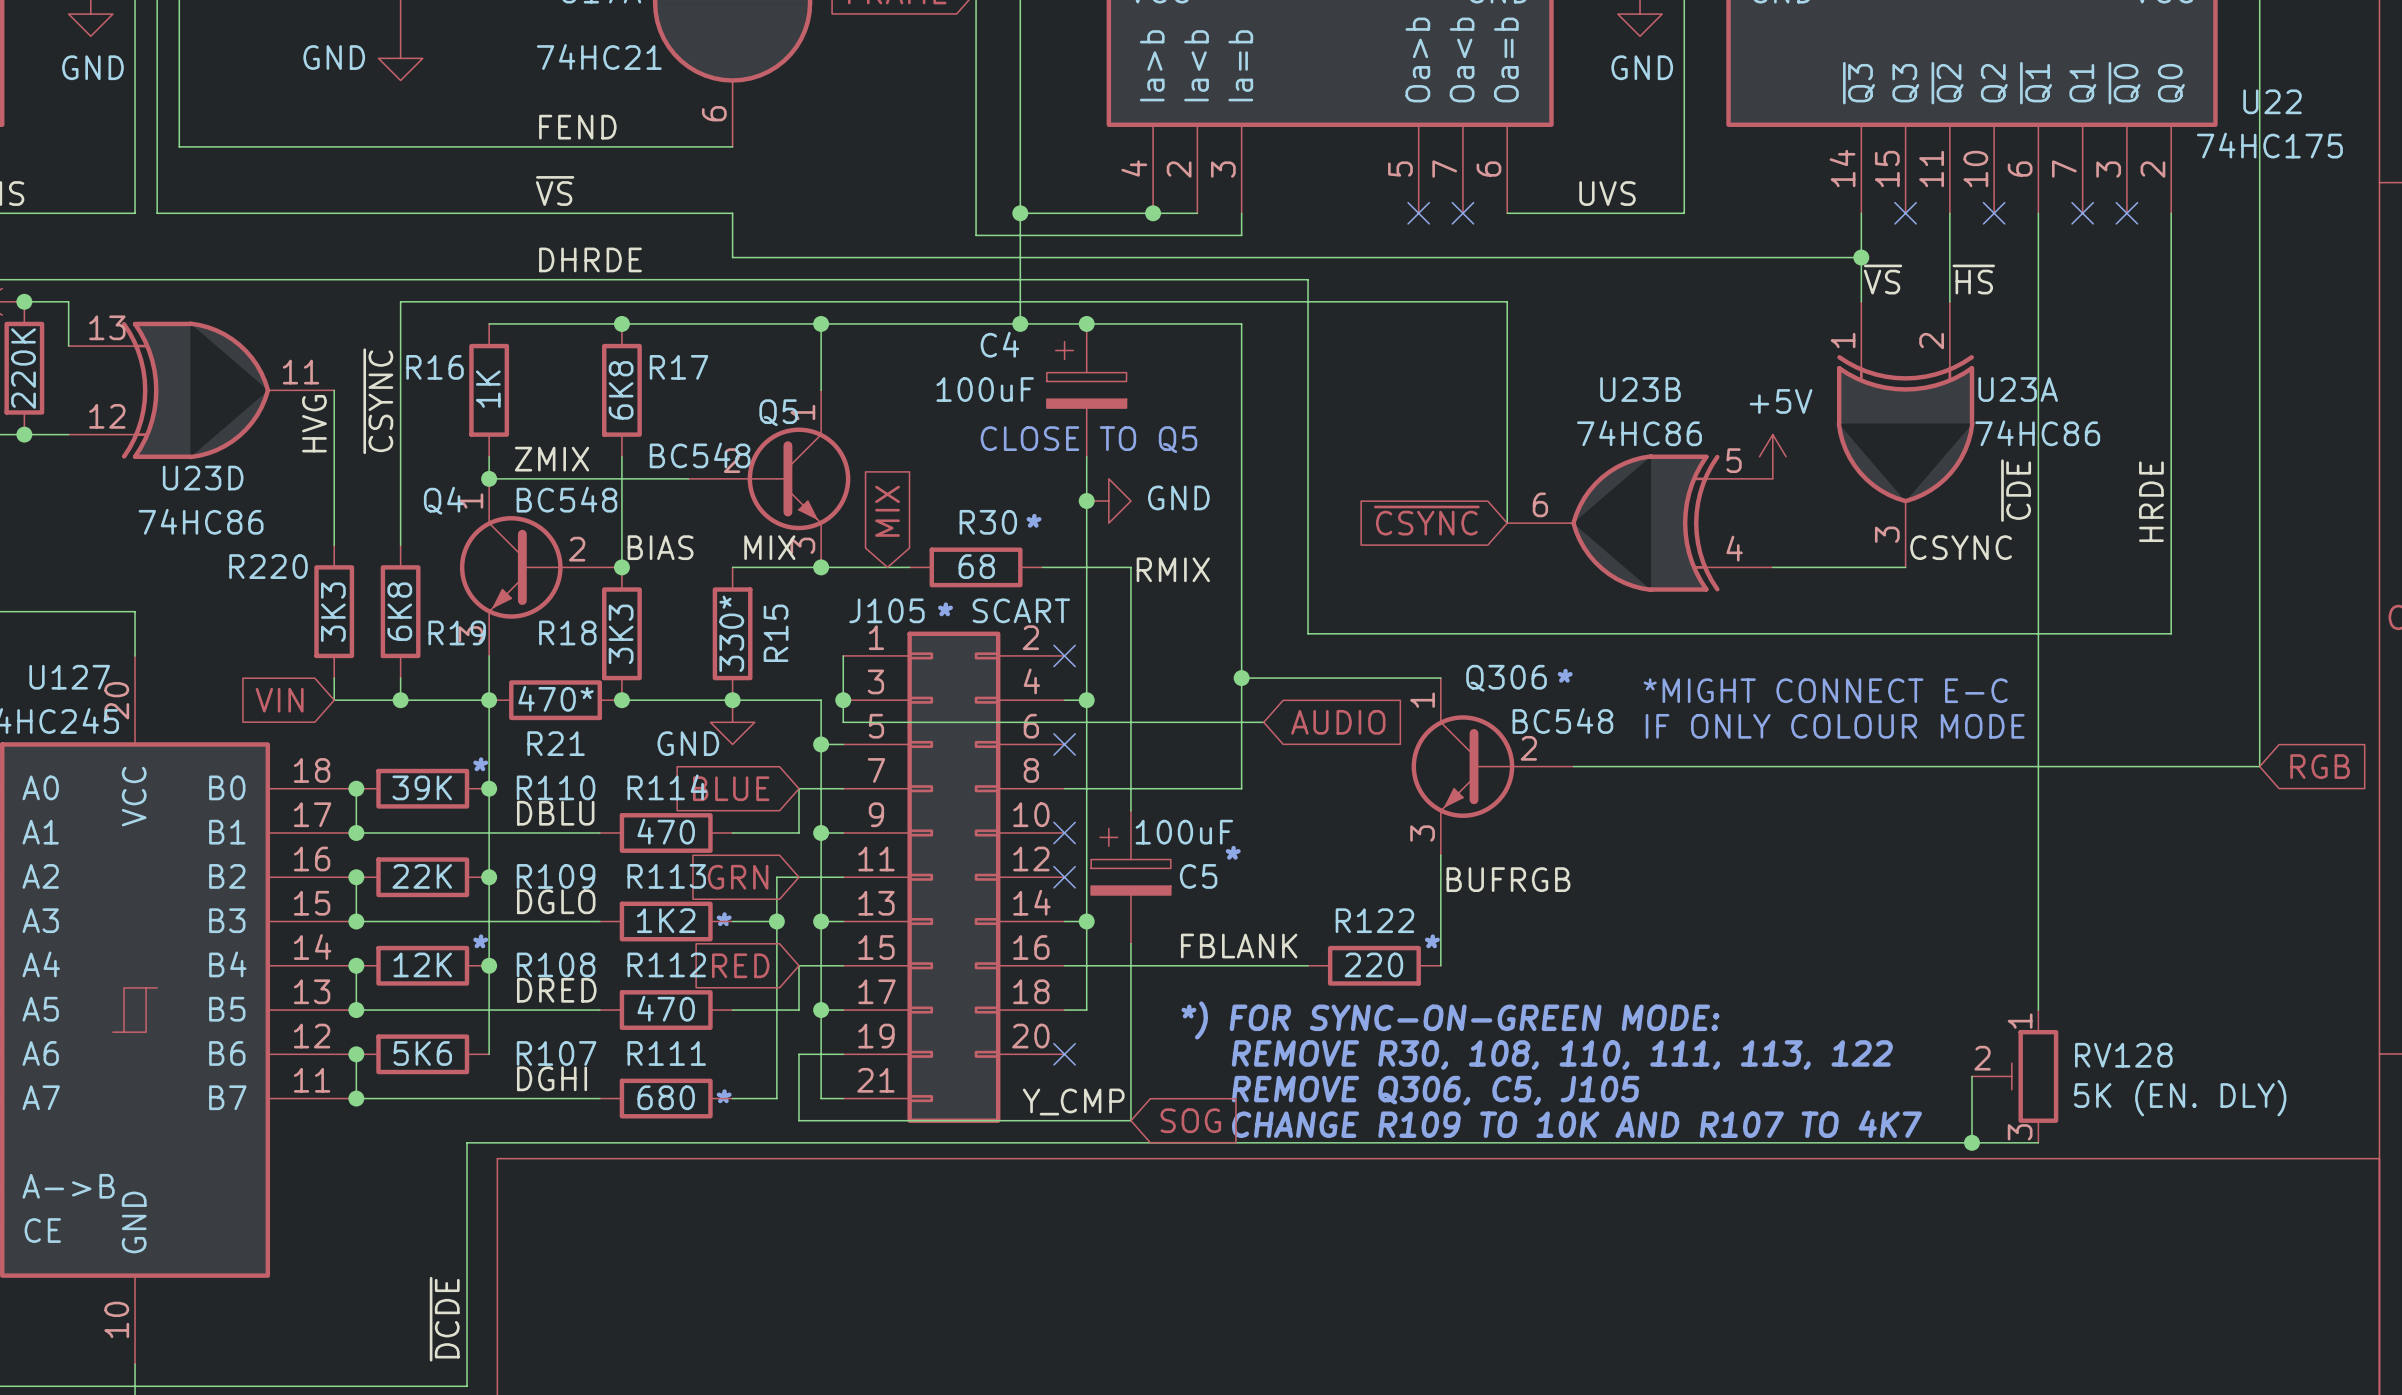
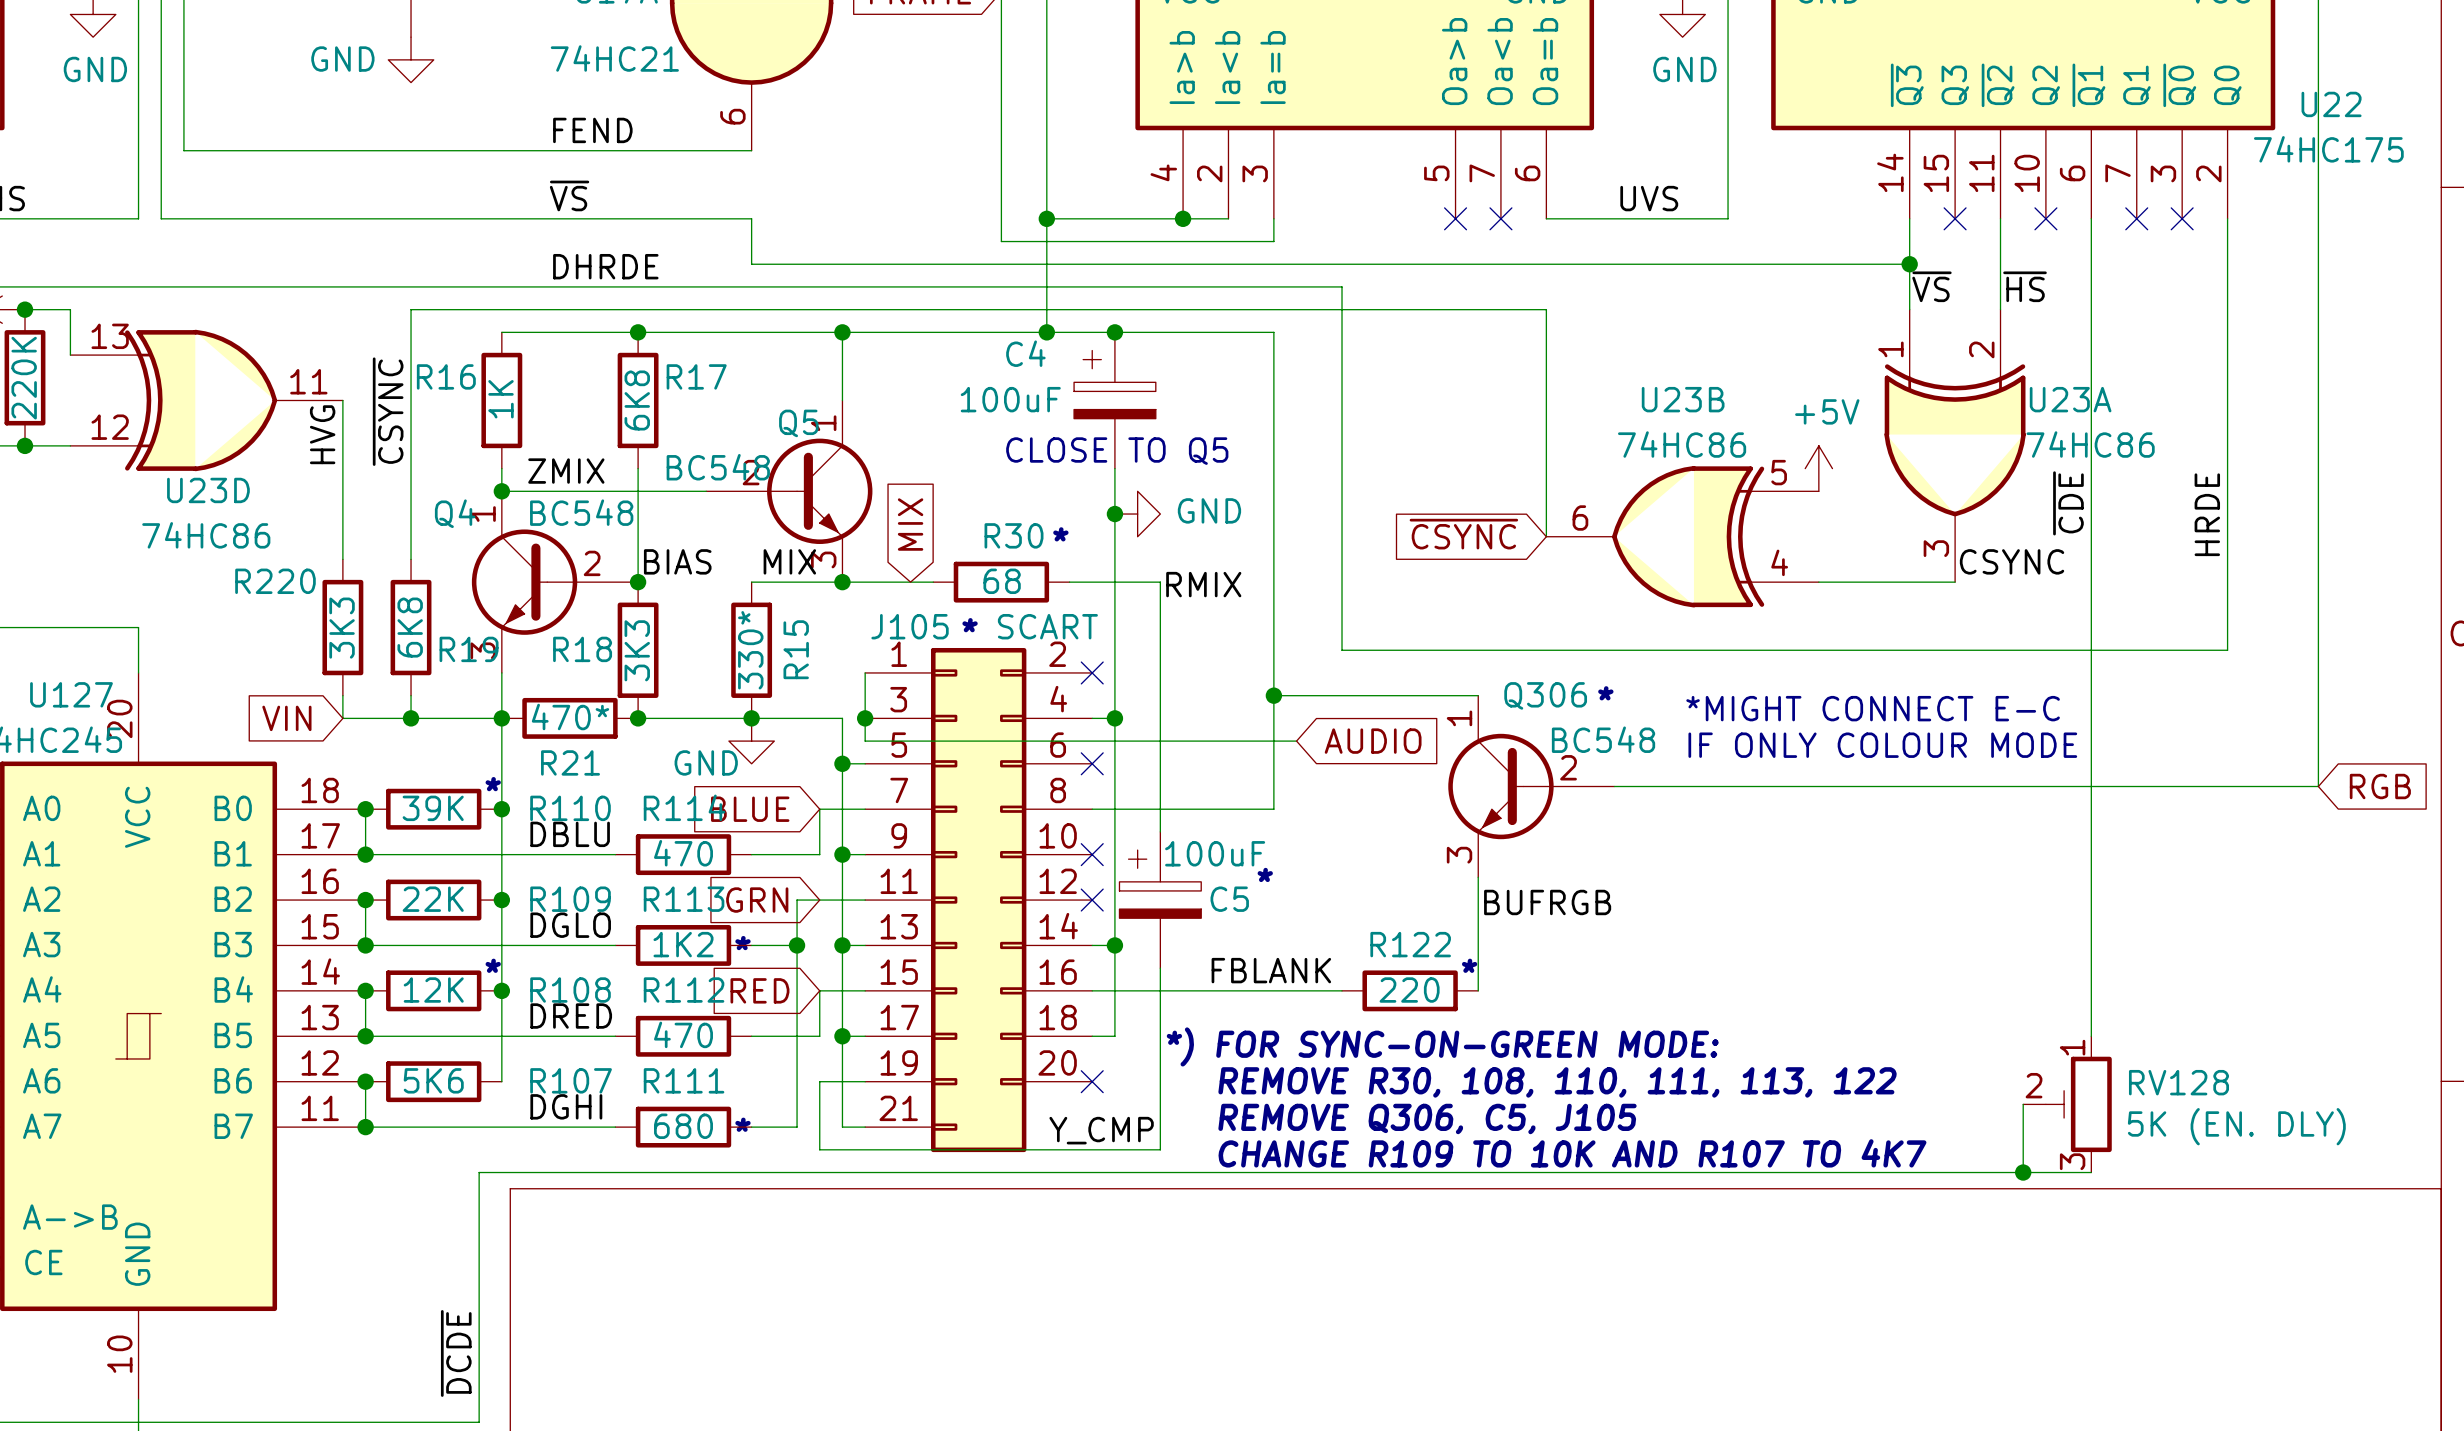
text position: *) FOR SYNC-ON-GREEN MODE: (1450, 1020) -> *) FOR SYNC-ON-GREEN MODE: (1442, 1046)
text position: REMOVE R30, 108, 110, 111, 113, 122 (1562, 1055) -> REMOVE R30, 108, 110, 111, 113, 122 (1557, 1082)
text position: REMOVE Q306, C5, J105 (1435, 1090) -> REMOVE Q306, C5, J105 (1427, 1118)
global label: SOG (1190, 1120) -> none
text position: CHANGE R109 TO 10K AND R107 TO 4K7 (1576, 1124) -> CHANGE R109 TO 10K AND R107 TO 4K7 (1572, 1153)

